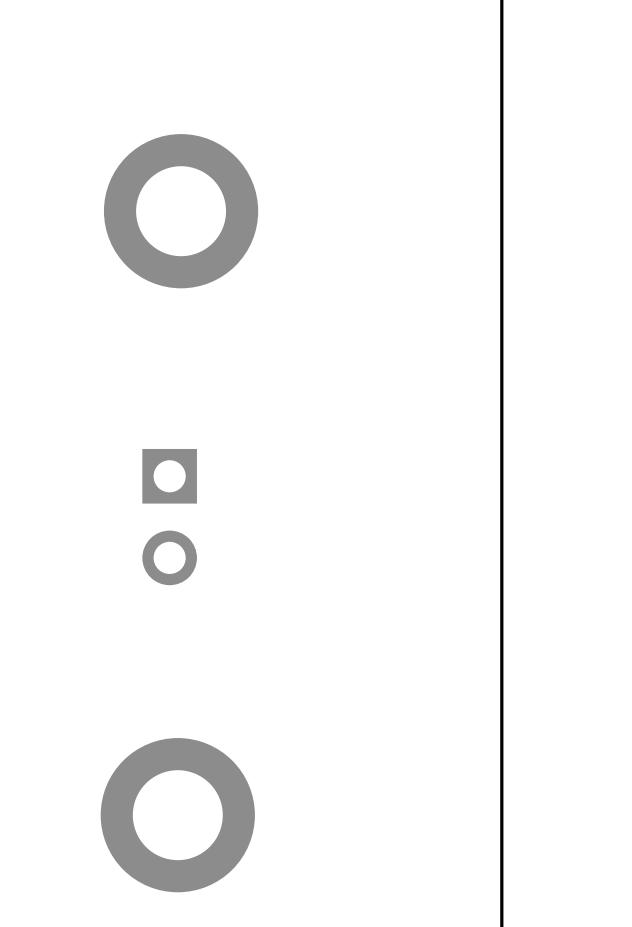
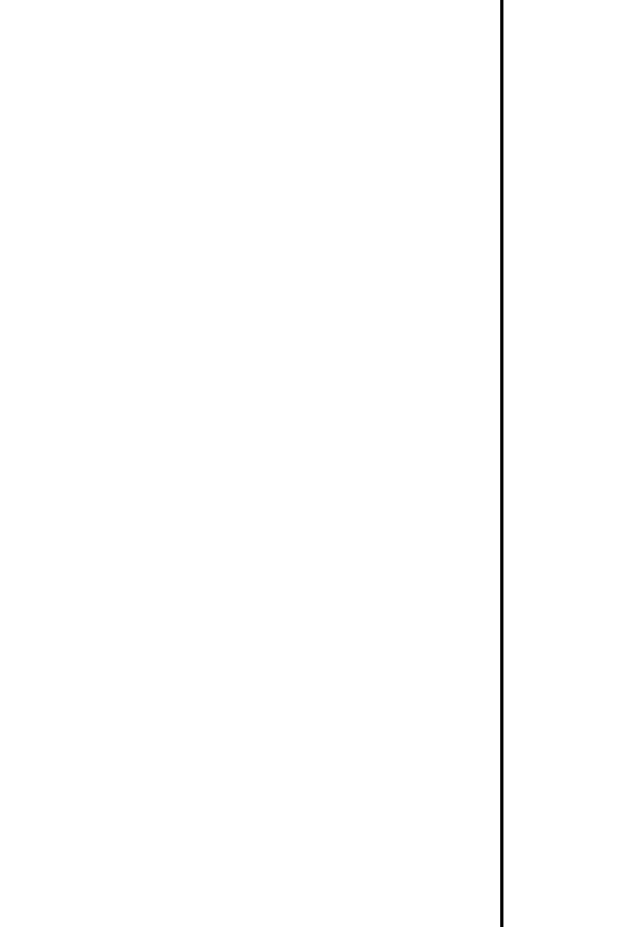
part: (181, 211) -> none
part: (169, 517) -> none
part: (177, 815) -> none

